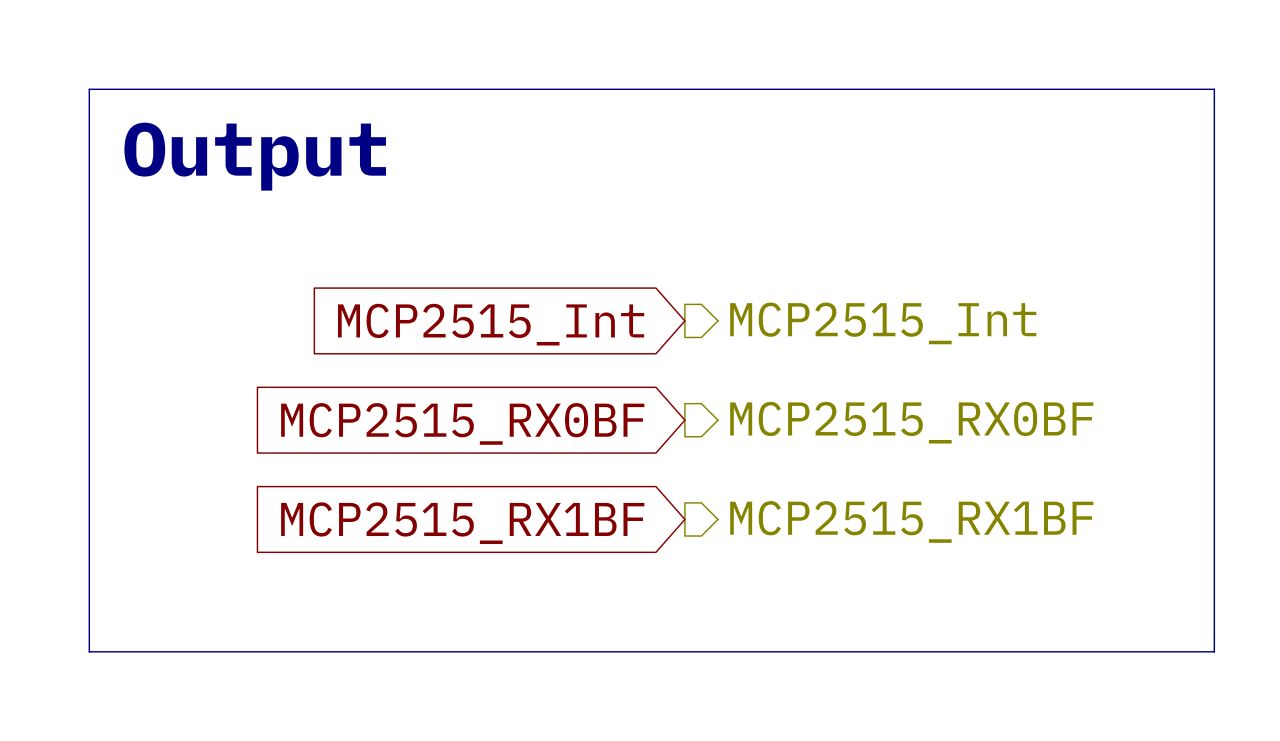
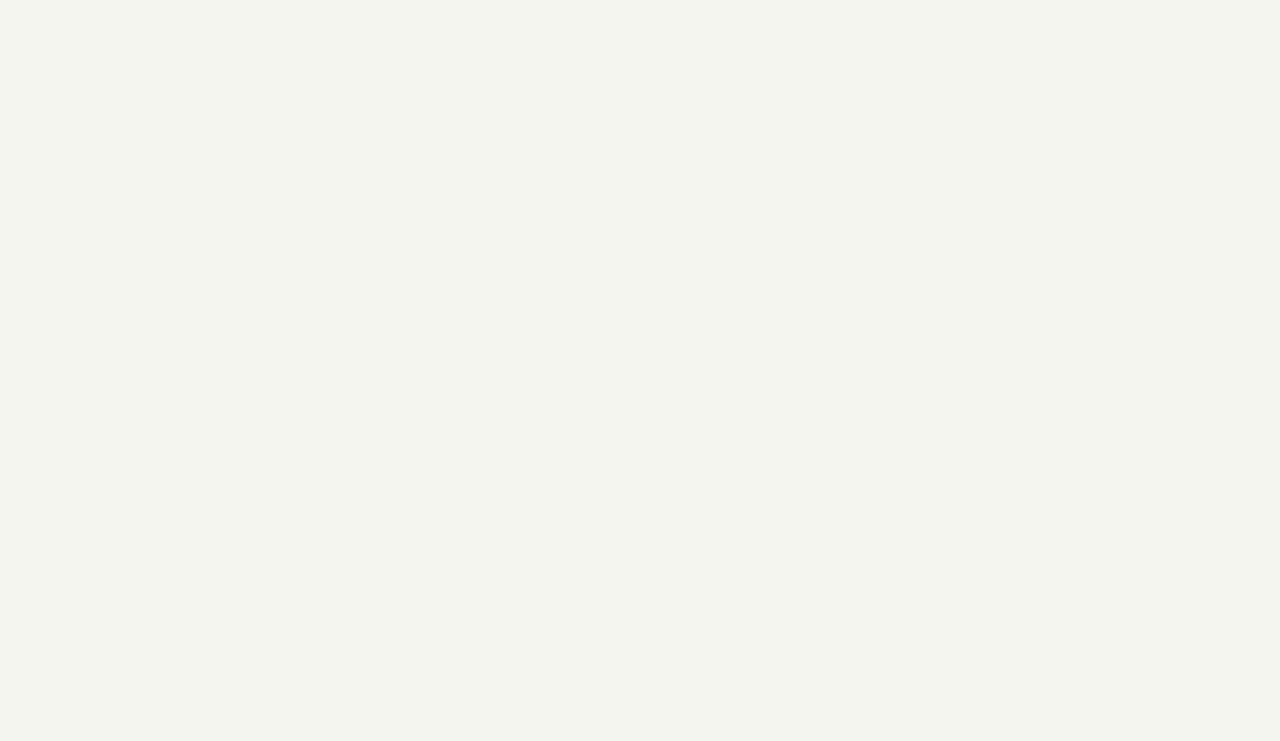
line: (89, 89) (1214, 89) (1214, 651) (89, 651) (89, 89) -> none
text: Output (255, 156) -> none
hierarchical label: MCP2515_Int (883, 323) -> none
global label: MCP2515_Int (491, 324) -> none
hierarchical label: MCP2515_RX0BF (911, 422) -> none
global label: MCP2515_RX0BF (462, 423) -> none
hierarchical label: MCP2515_RX1BF (911, 521) -> none
global label: MCP2515_RX1BF (462, 523) -> none

